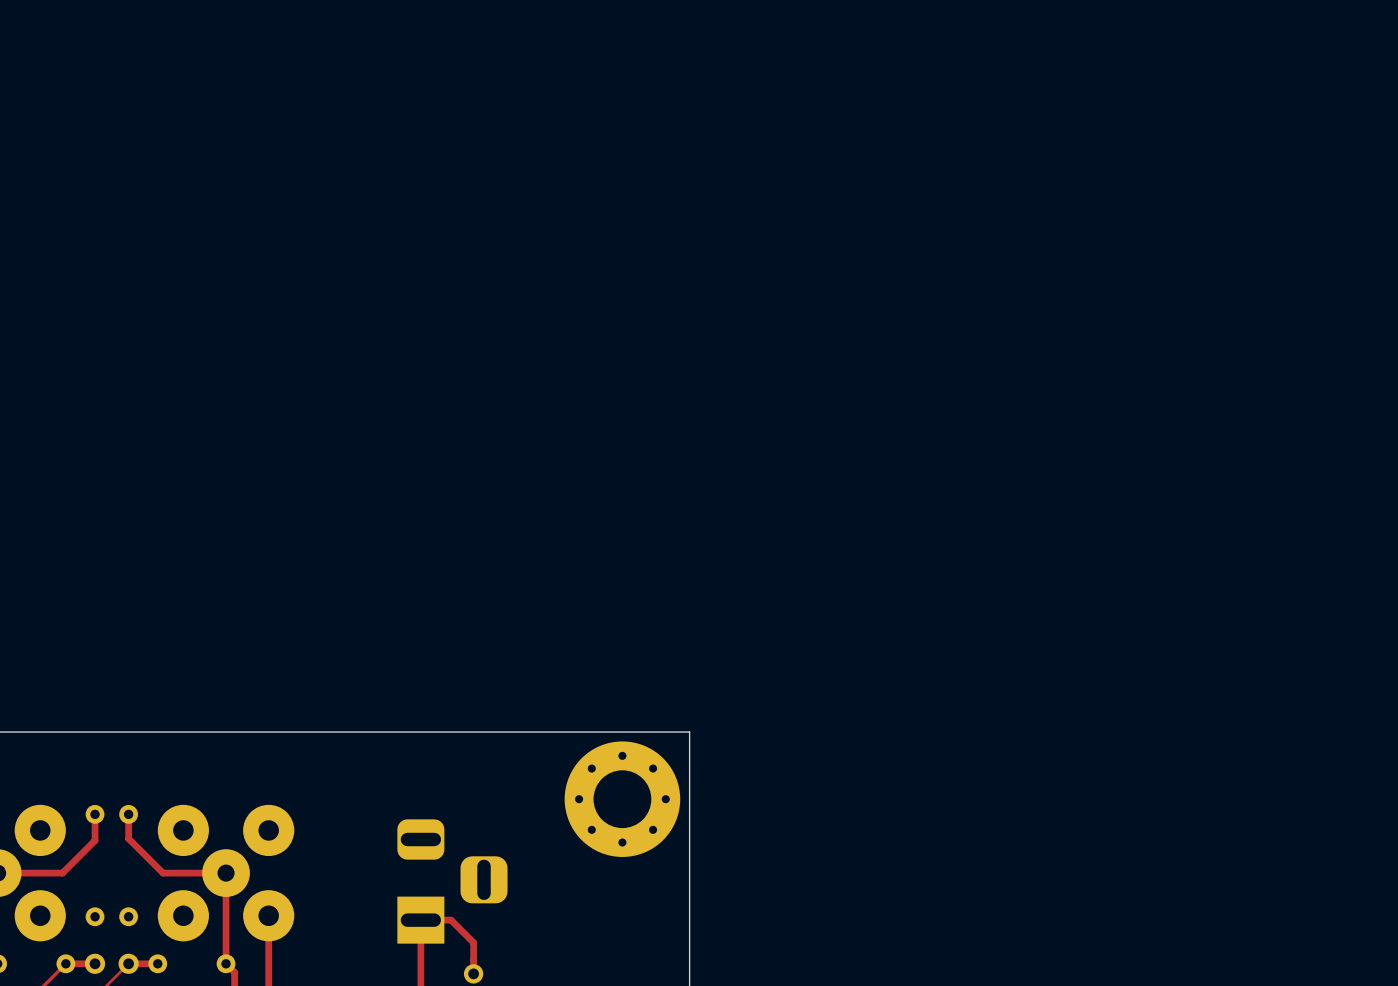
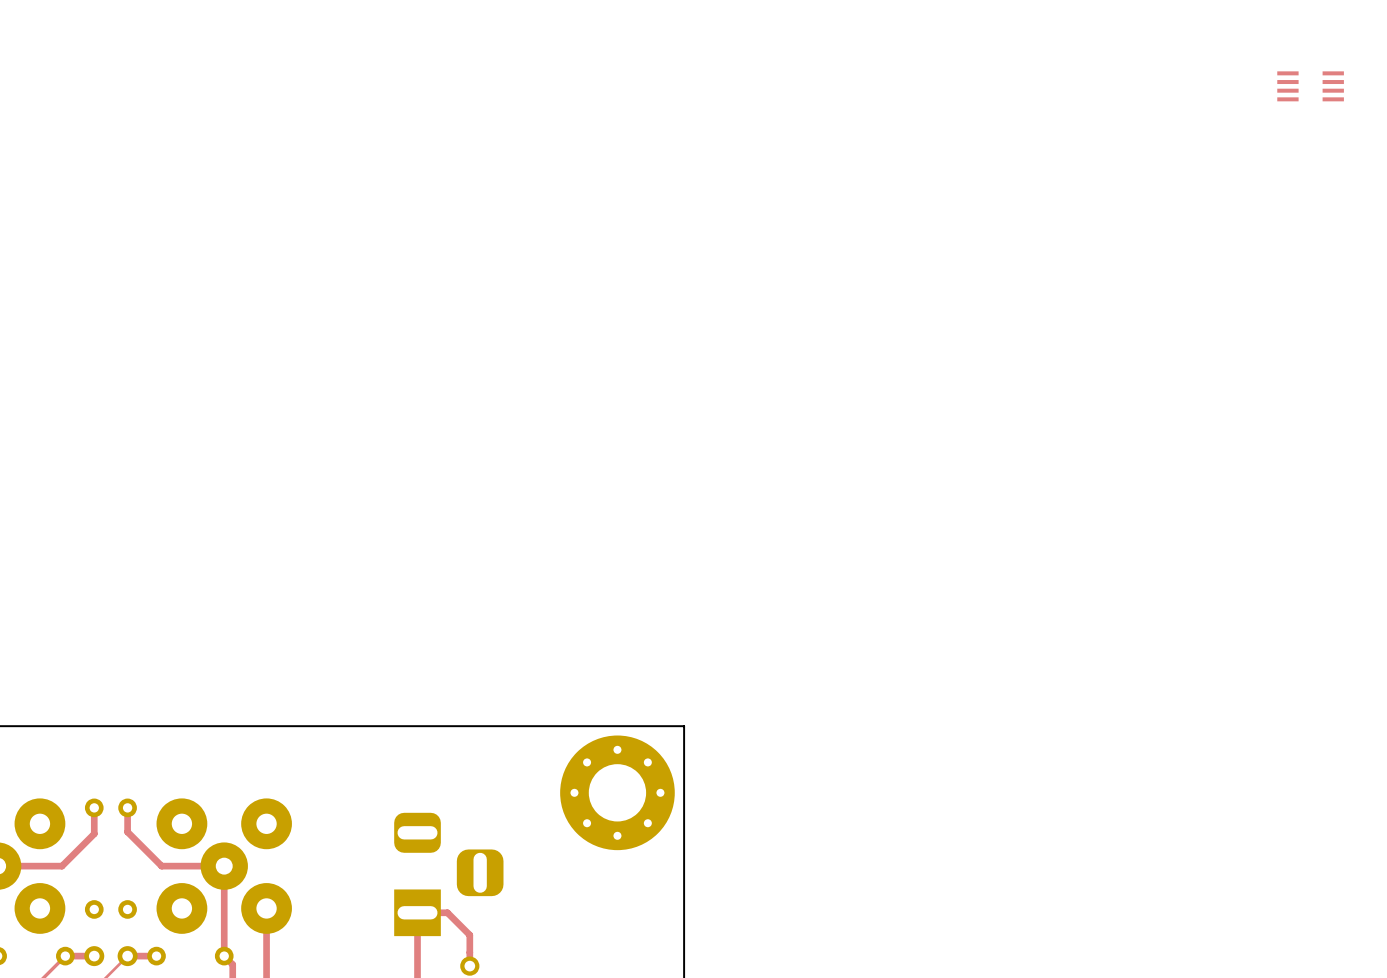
part: none -> (1310, 86)

